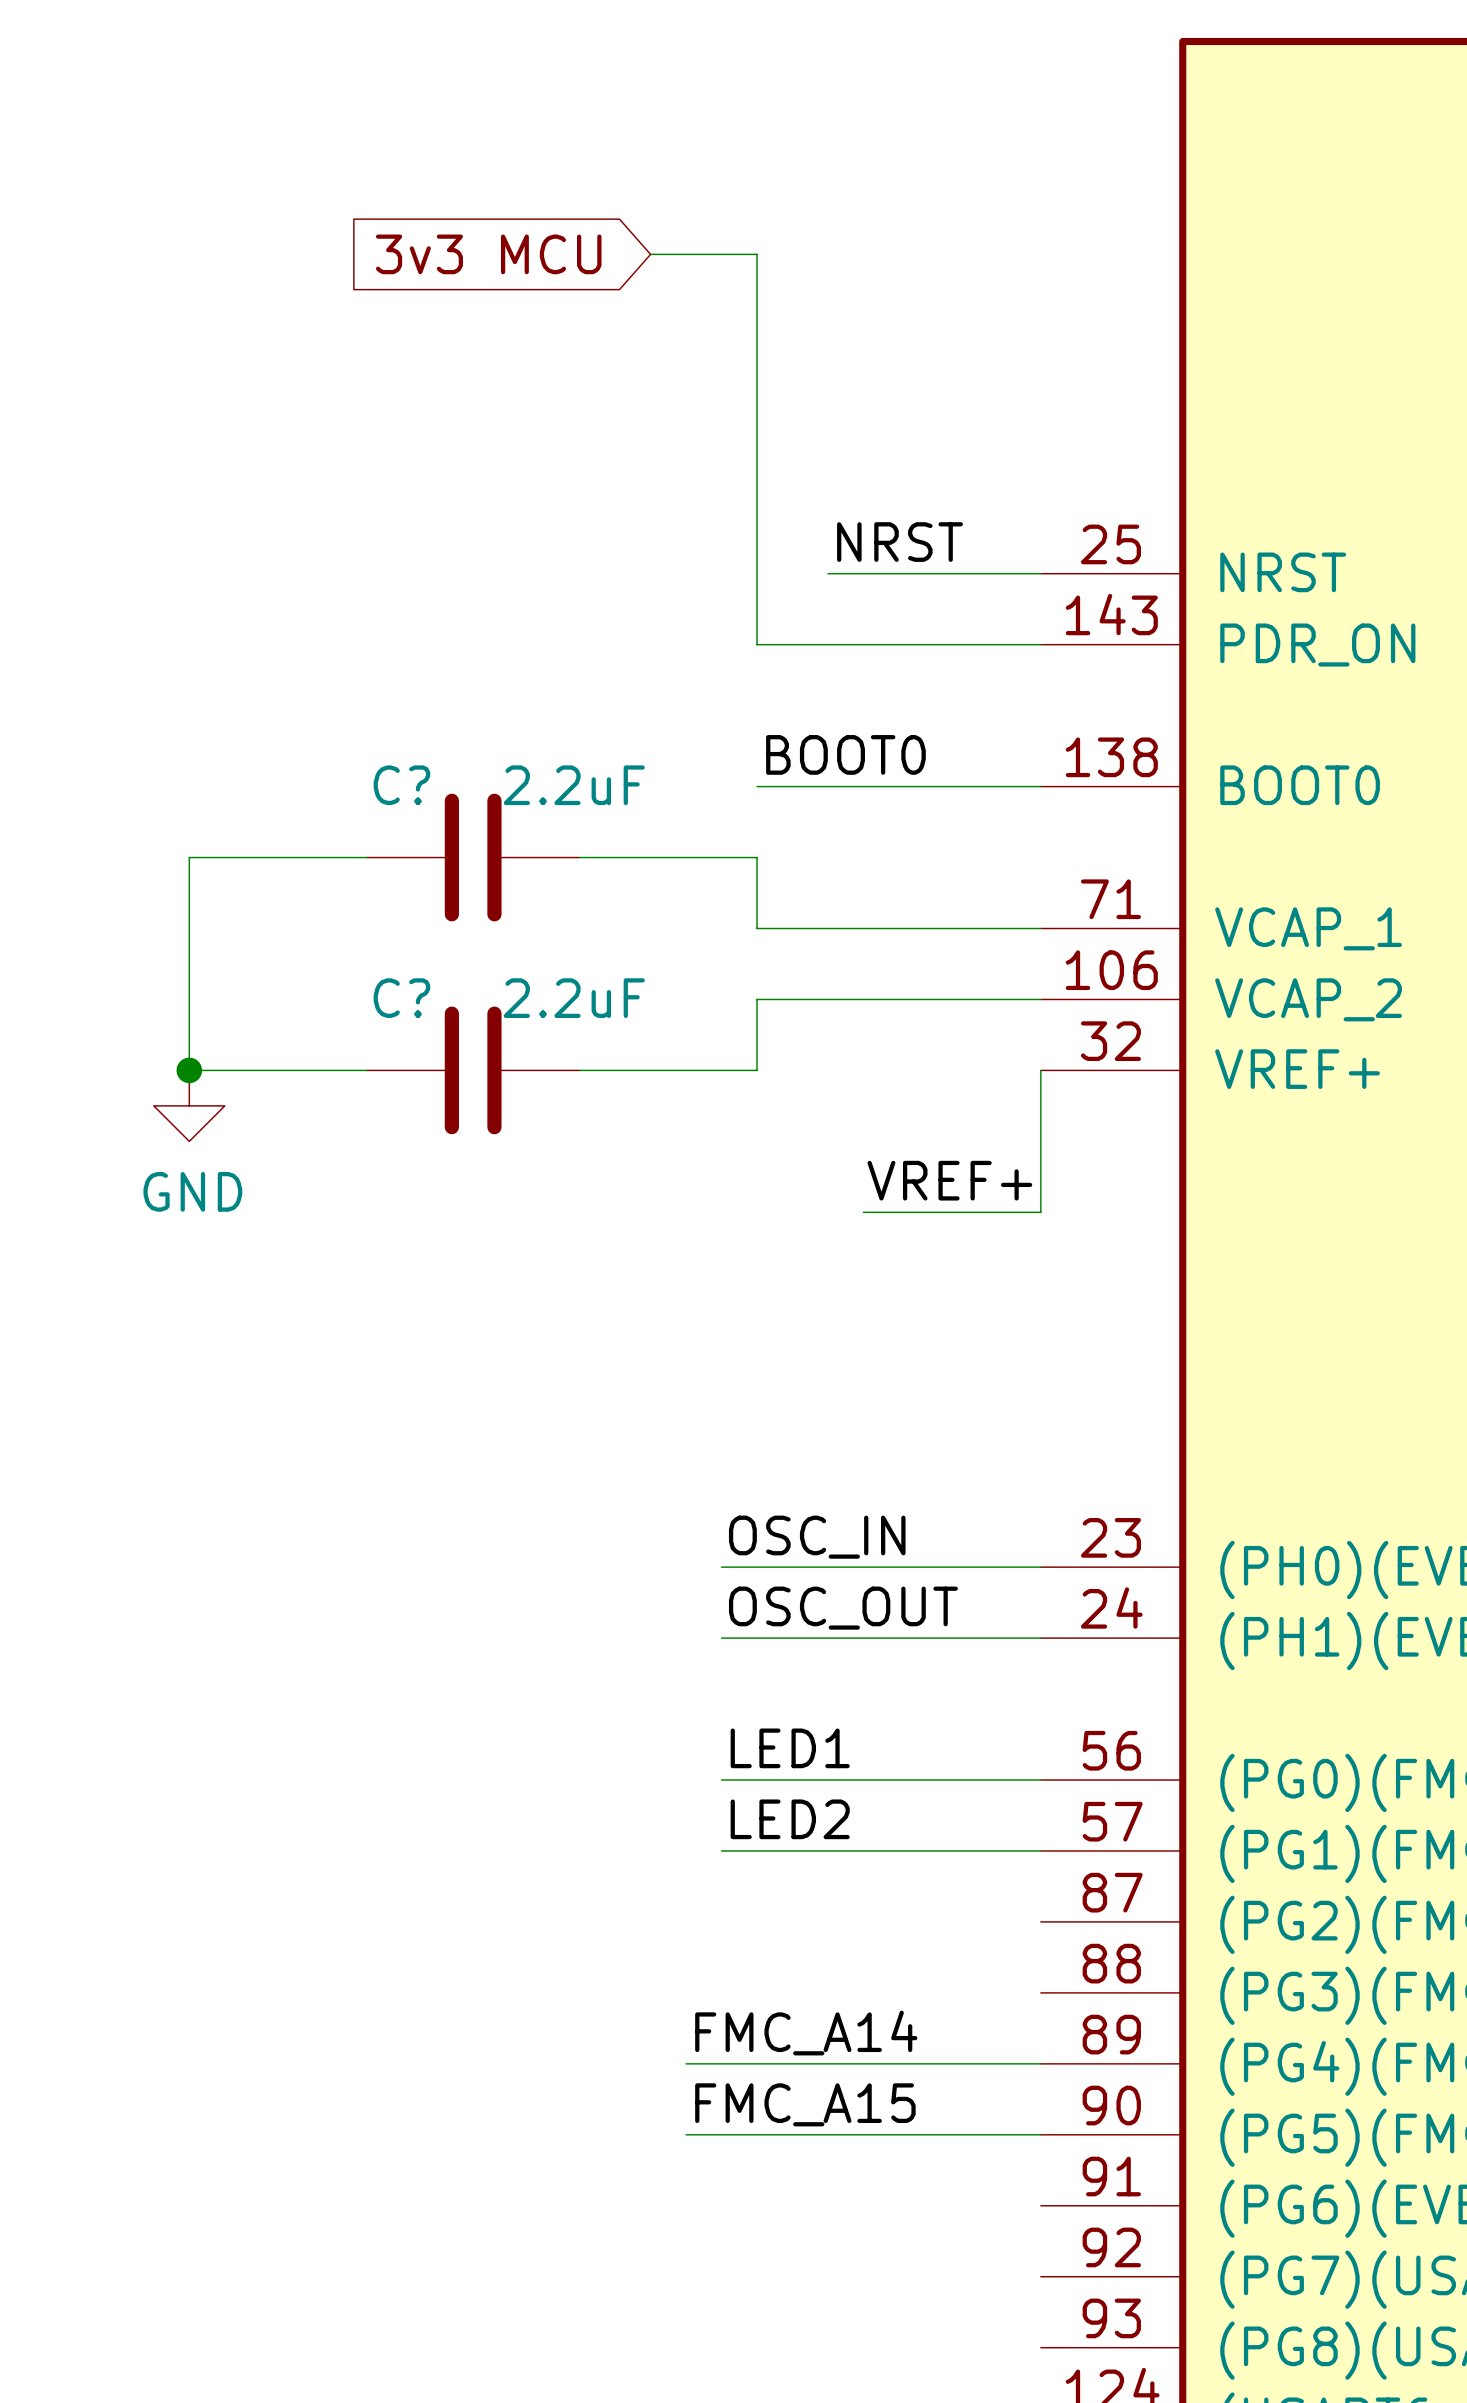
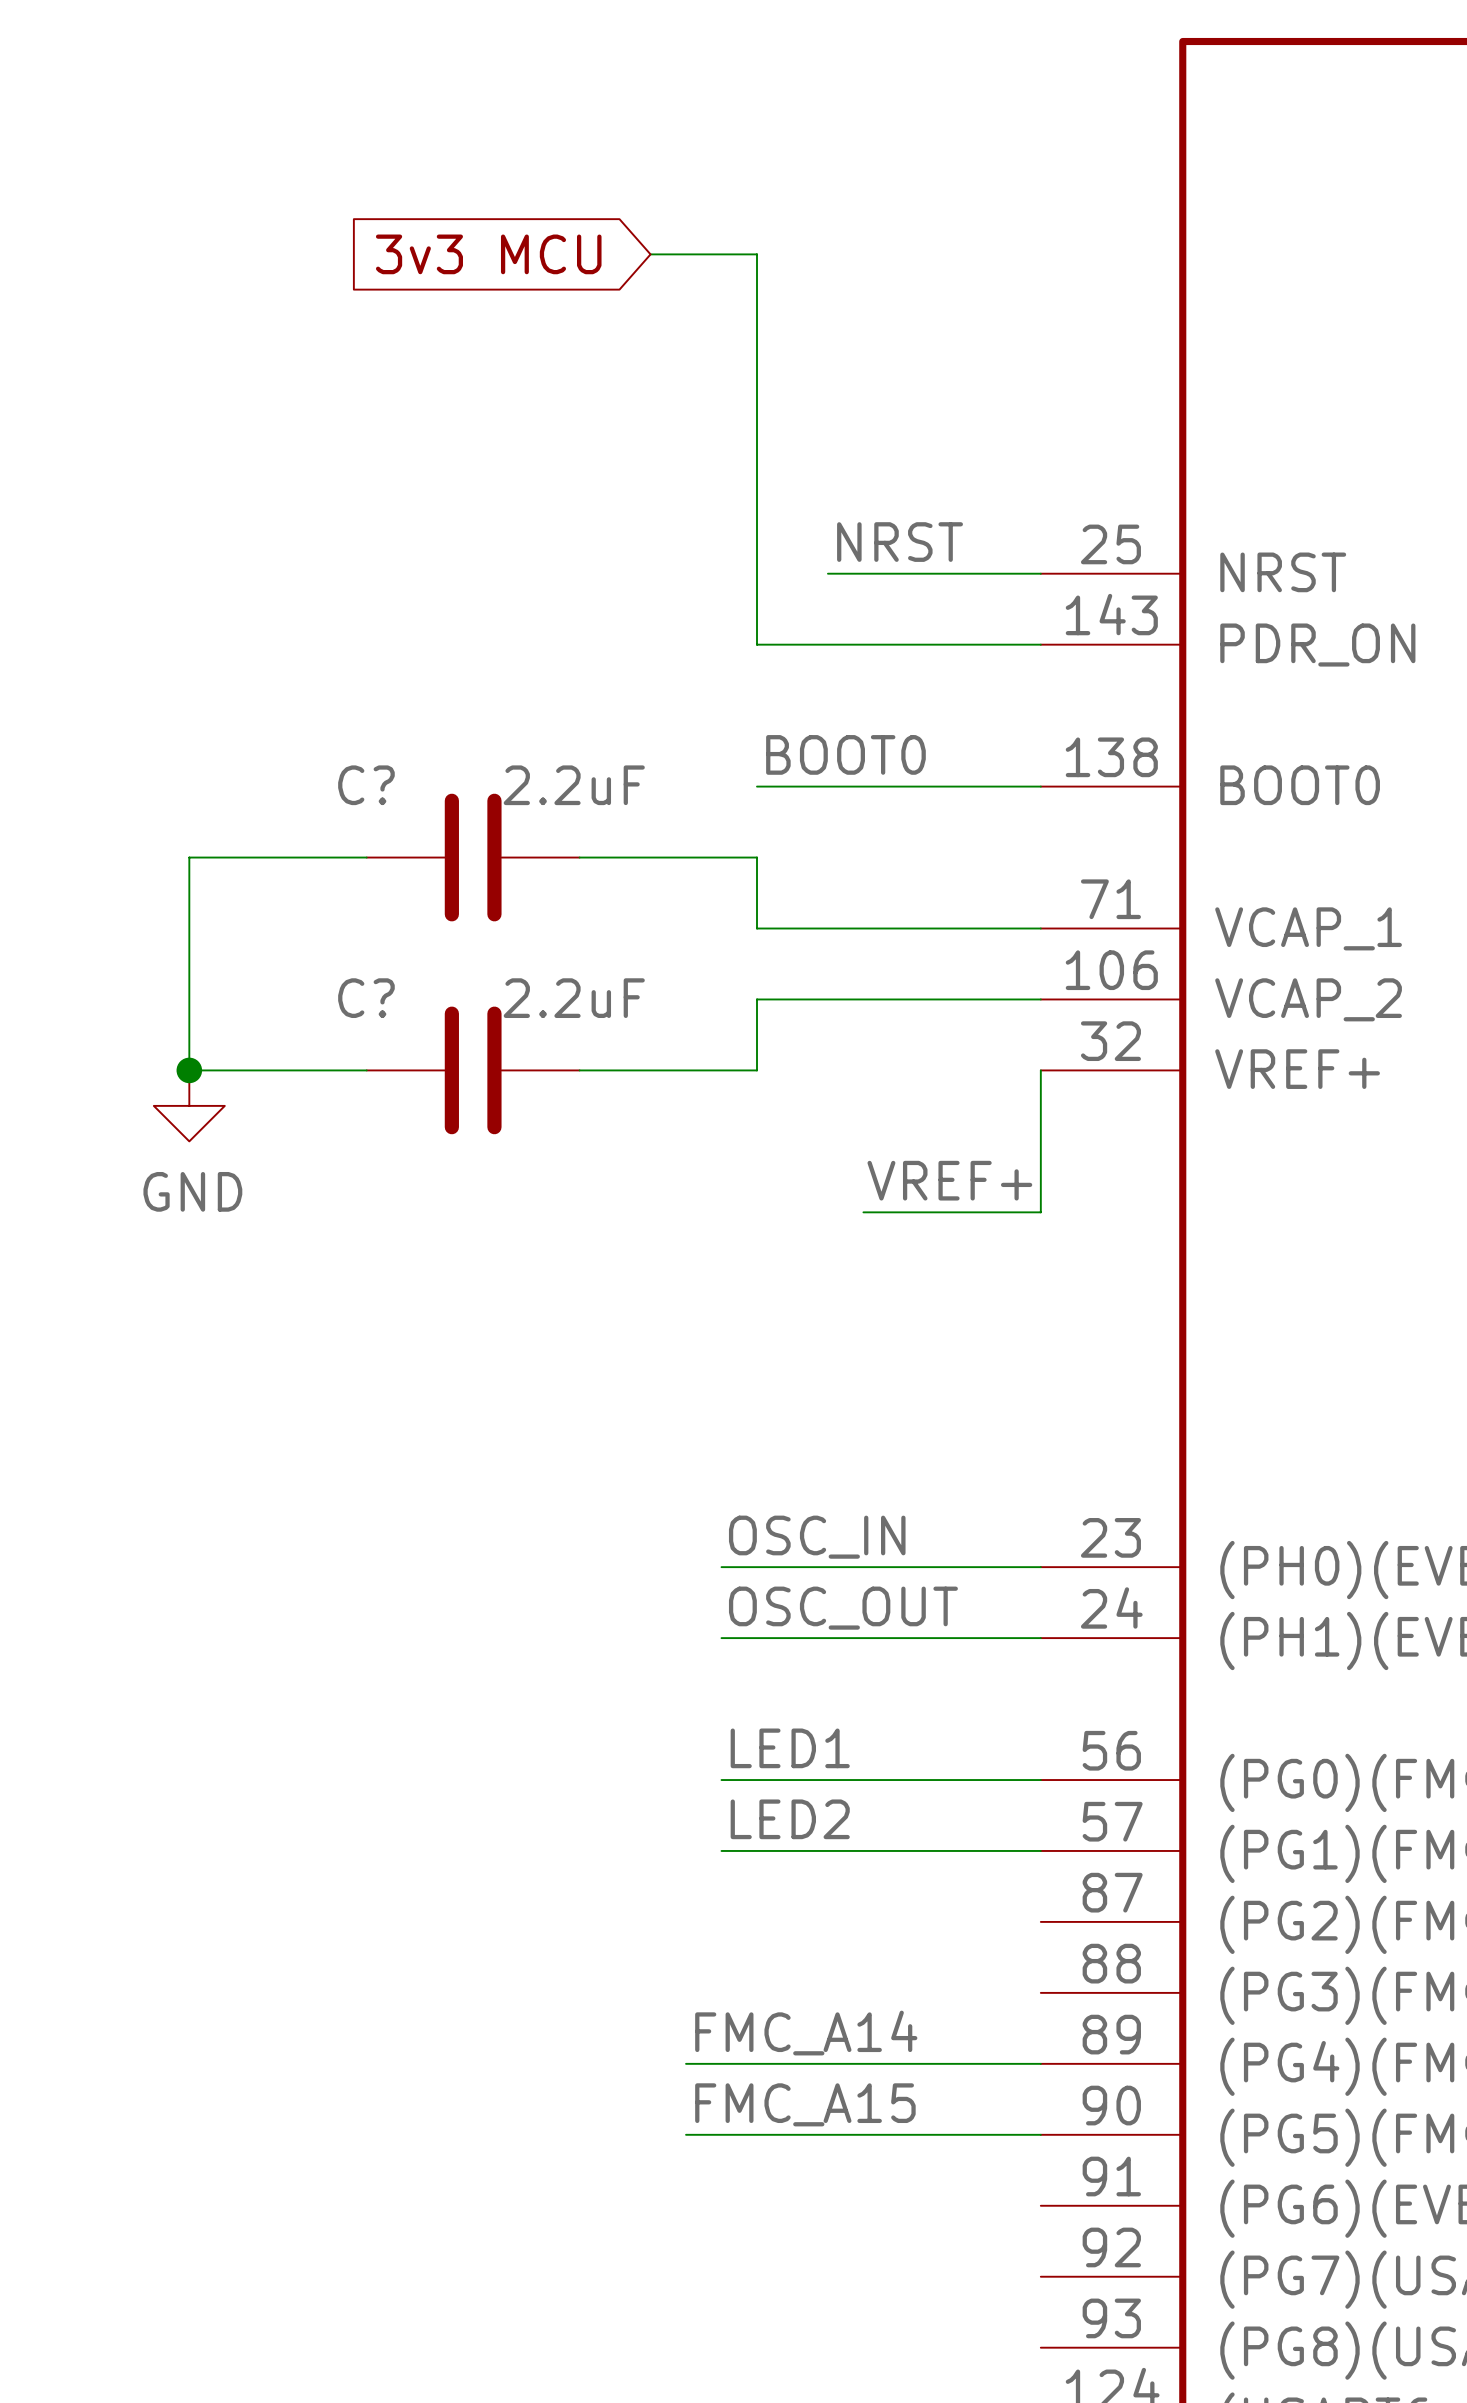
C? name position: C? (401, 785) -> C? (366, 785)
C? name position: C? (401, 998) -> C? (366, 998)

